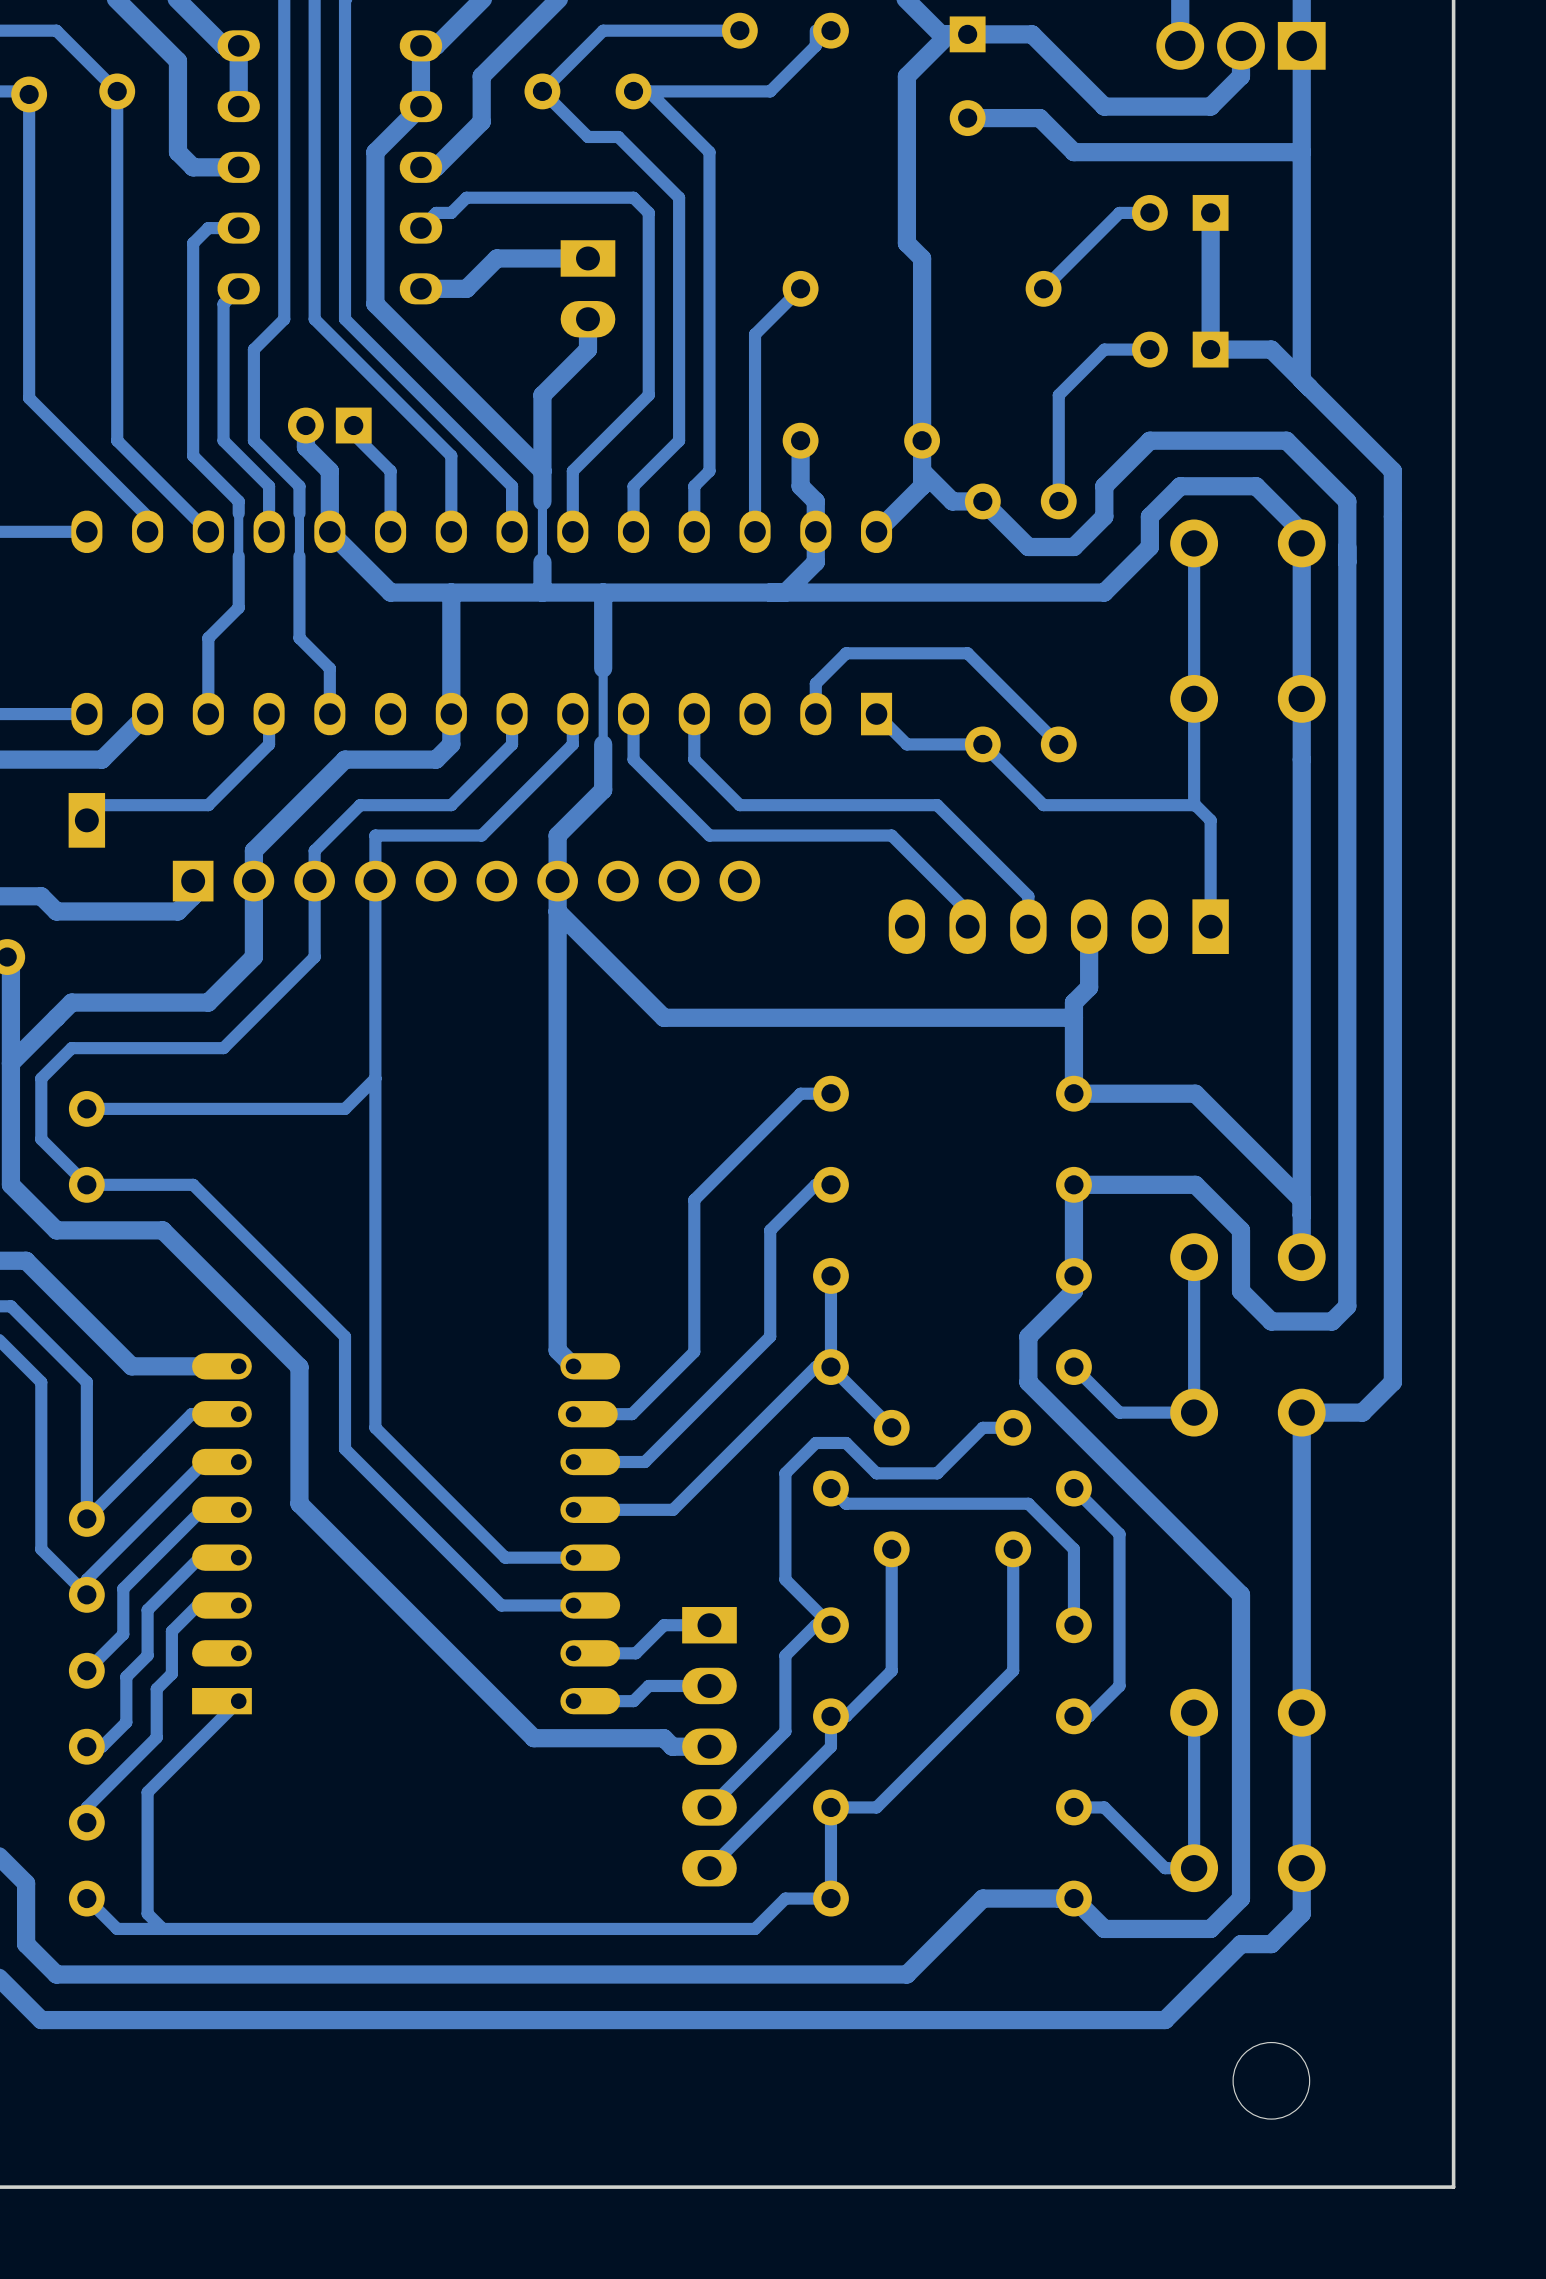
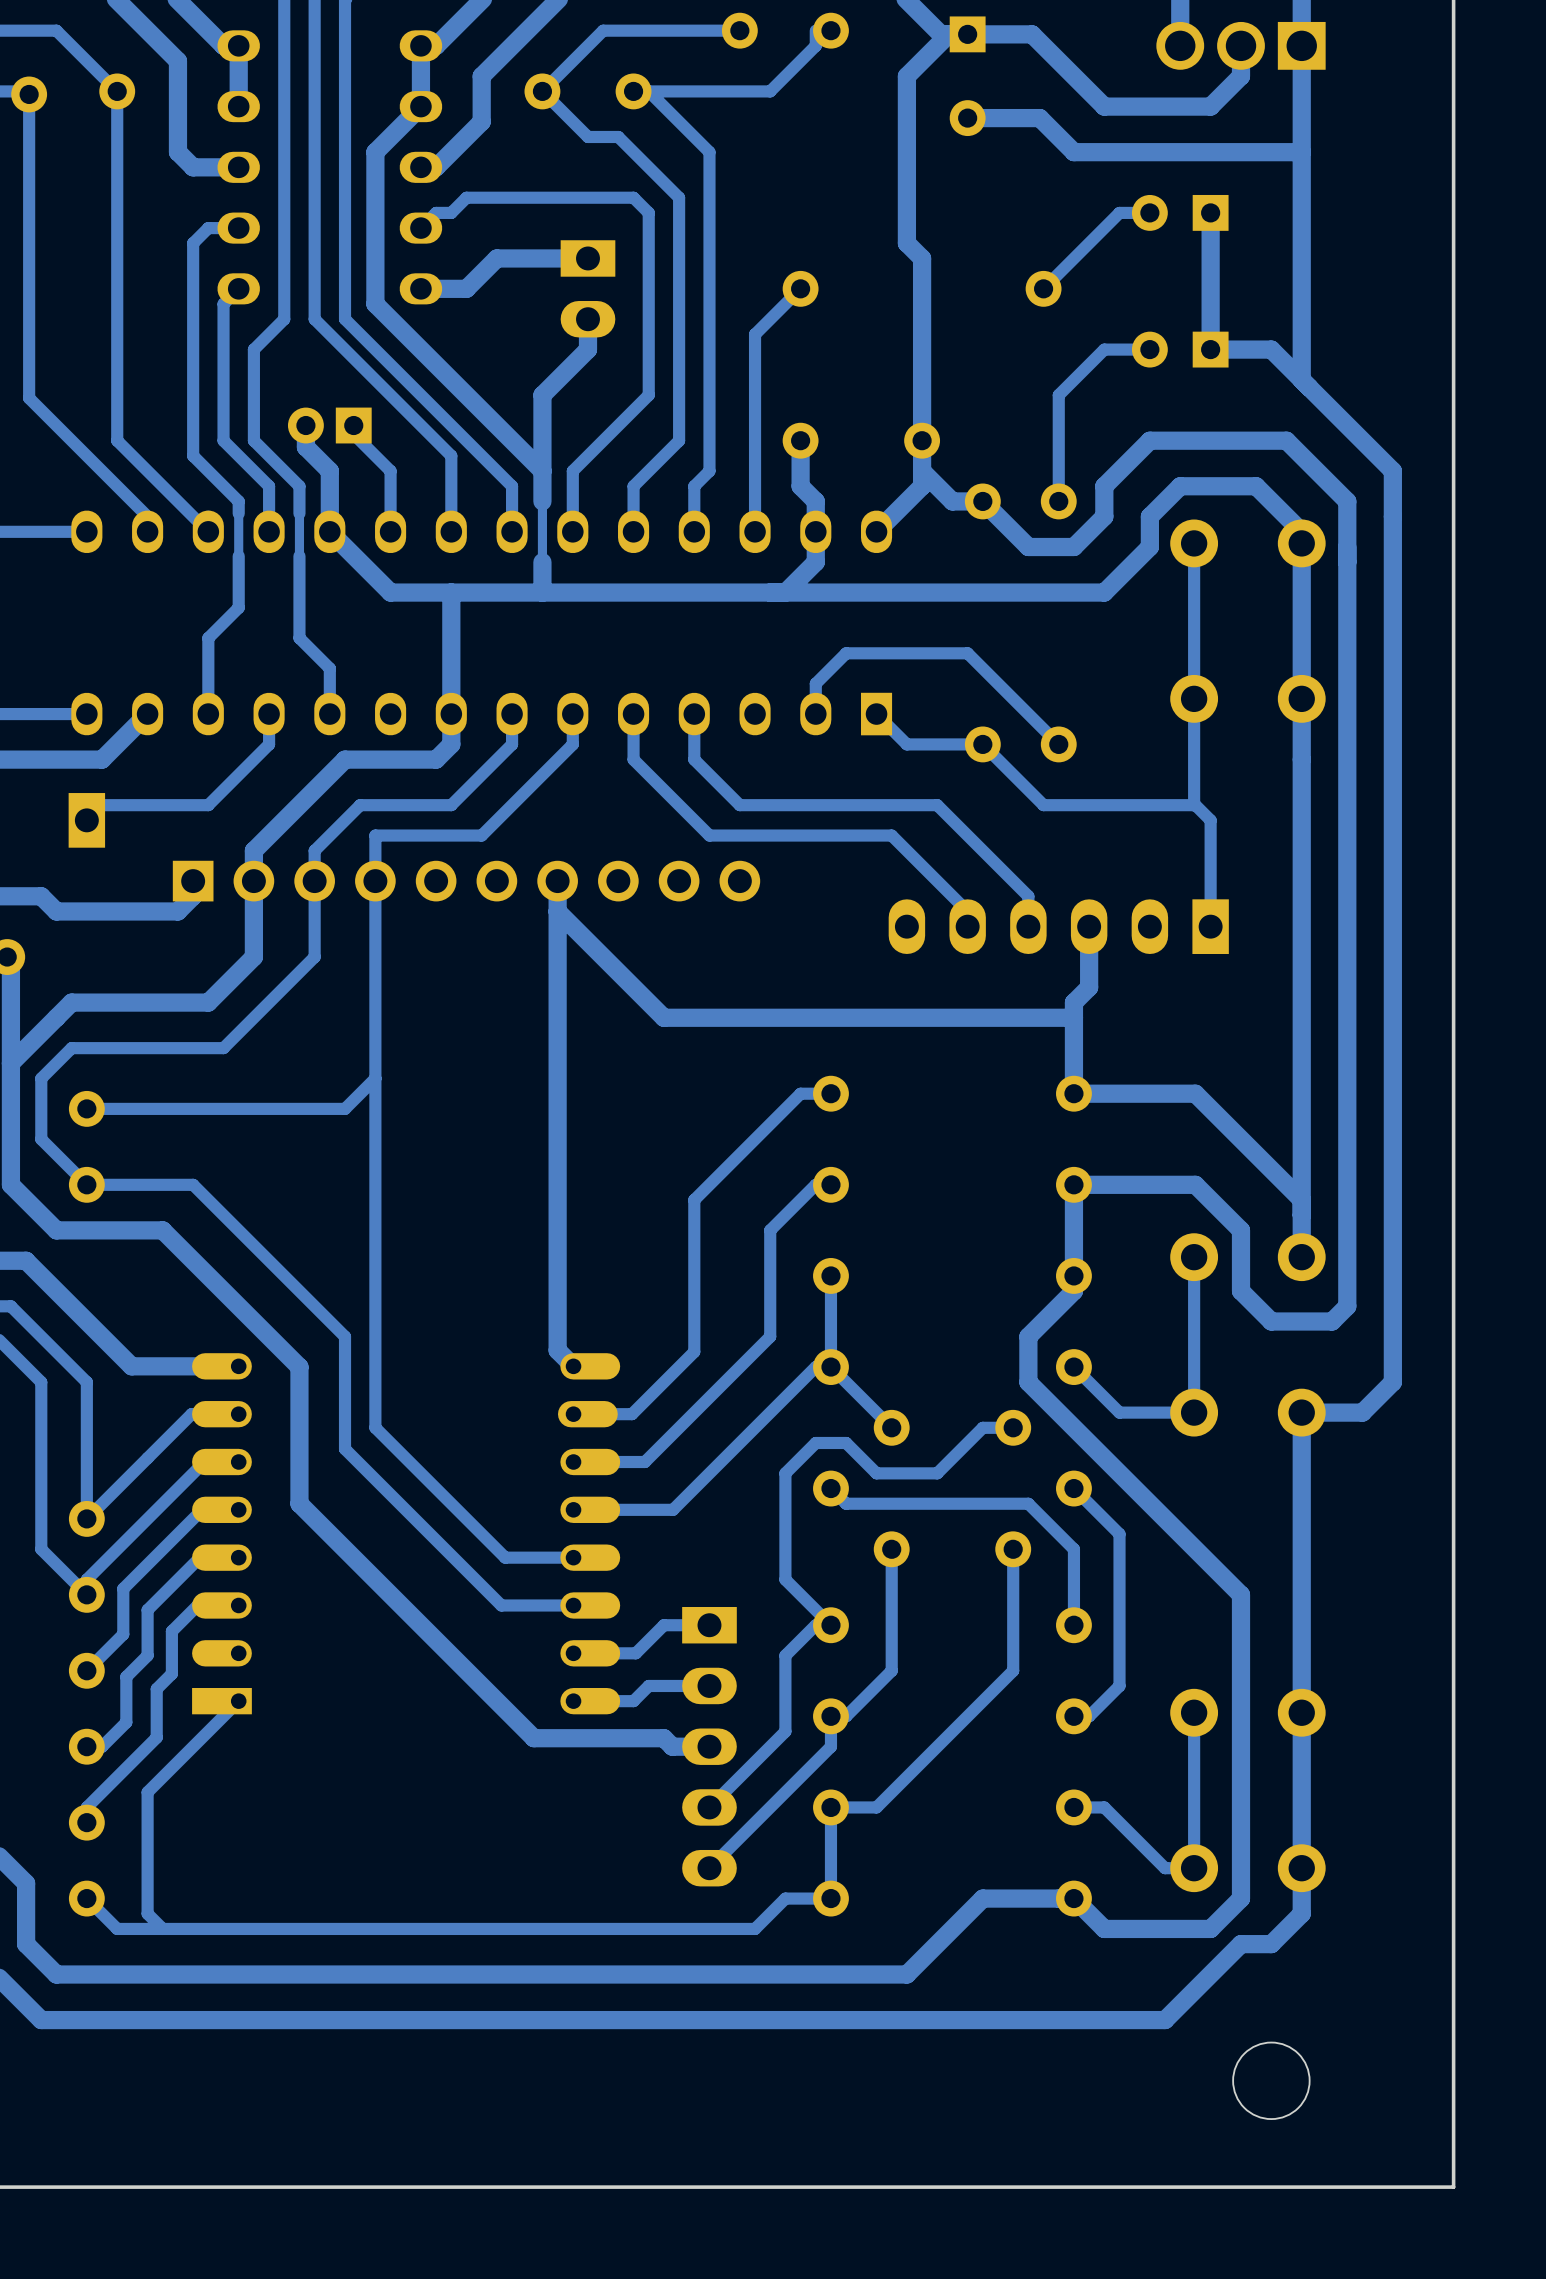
track: (603, 592) (603, 789) (557, 835) (557, 881) -> none

